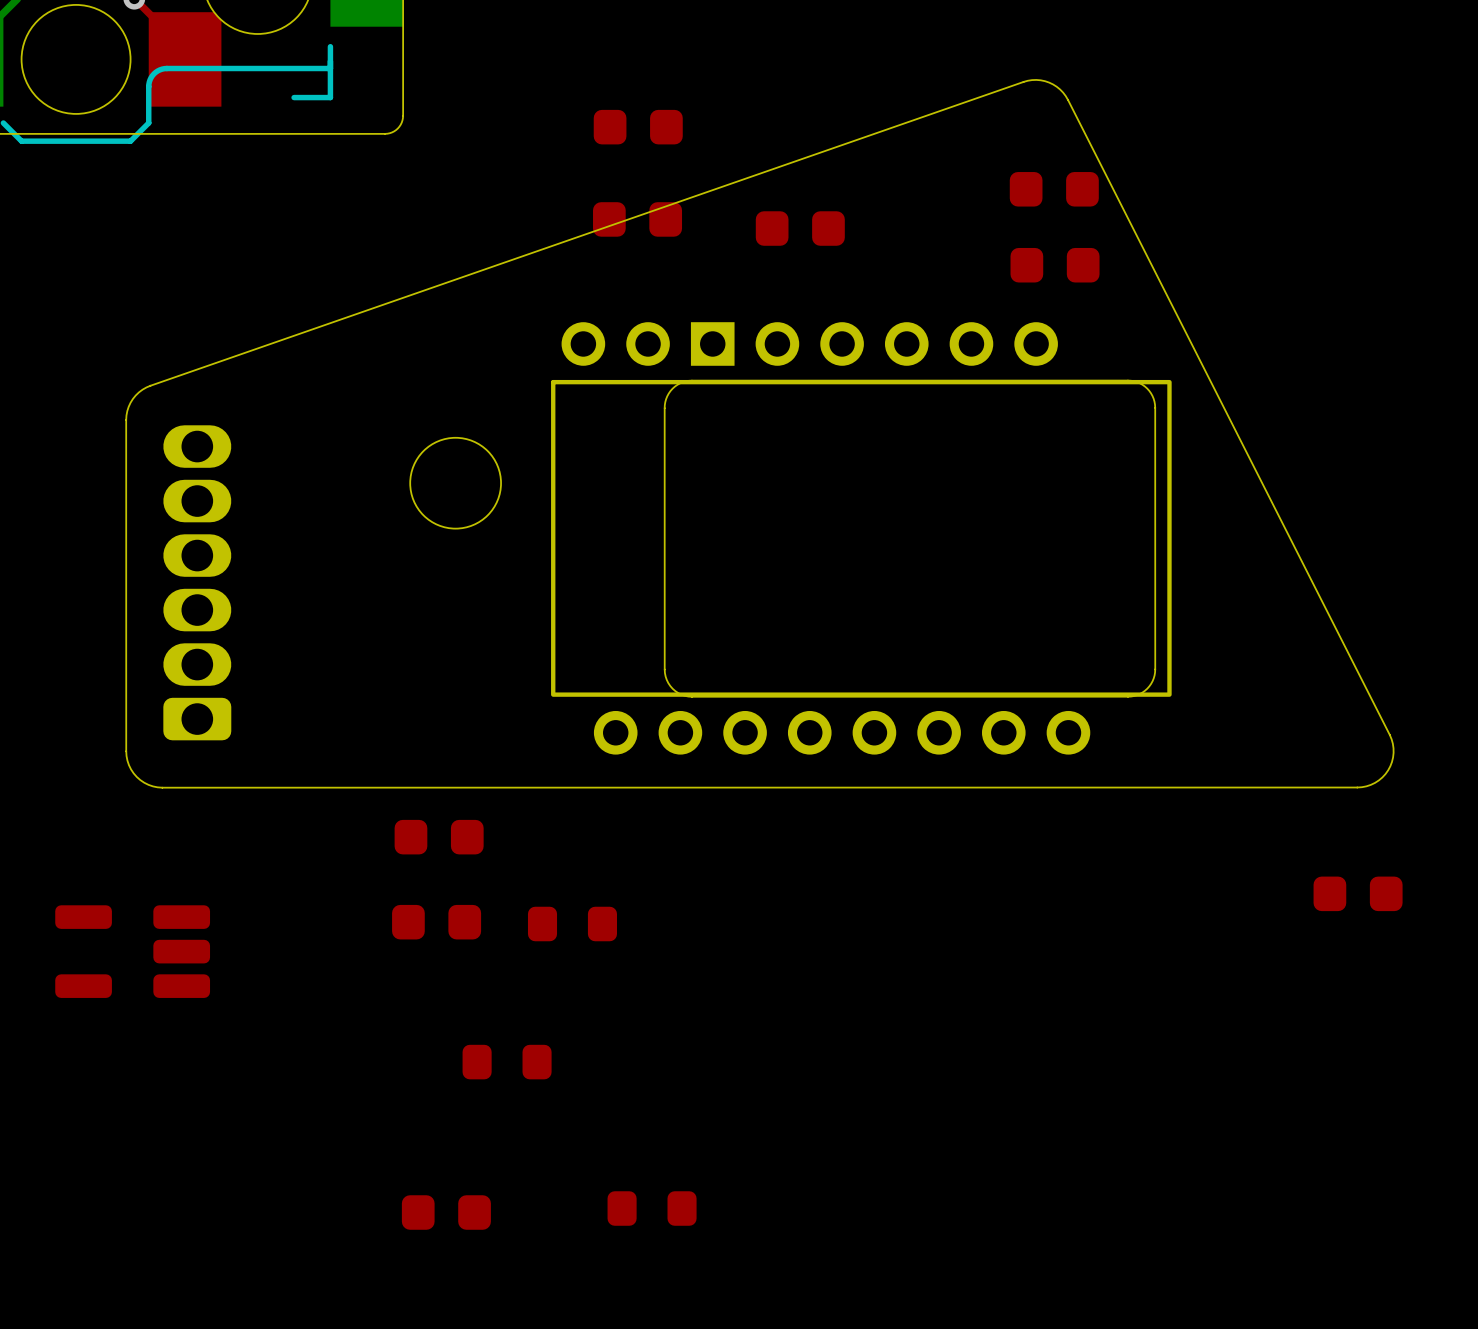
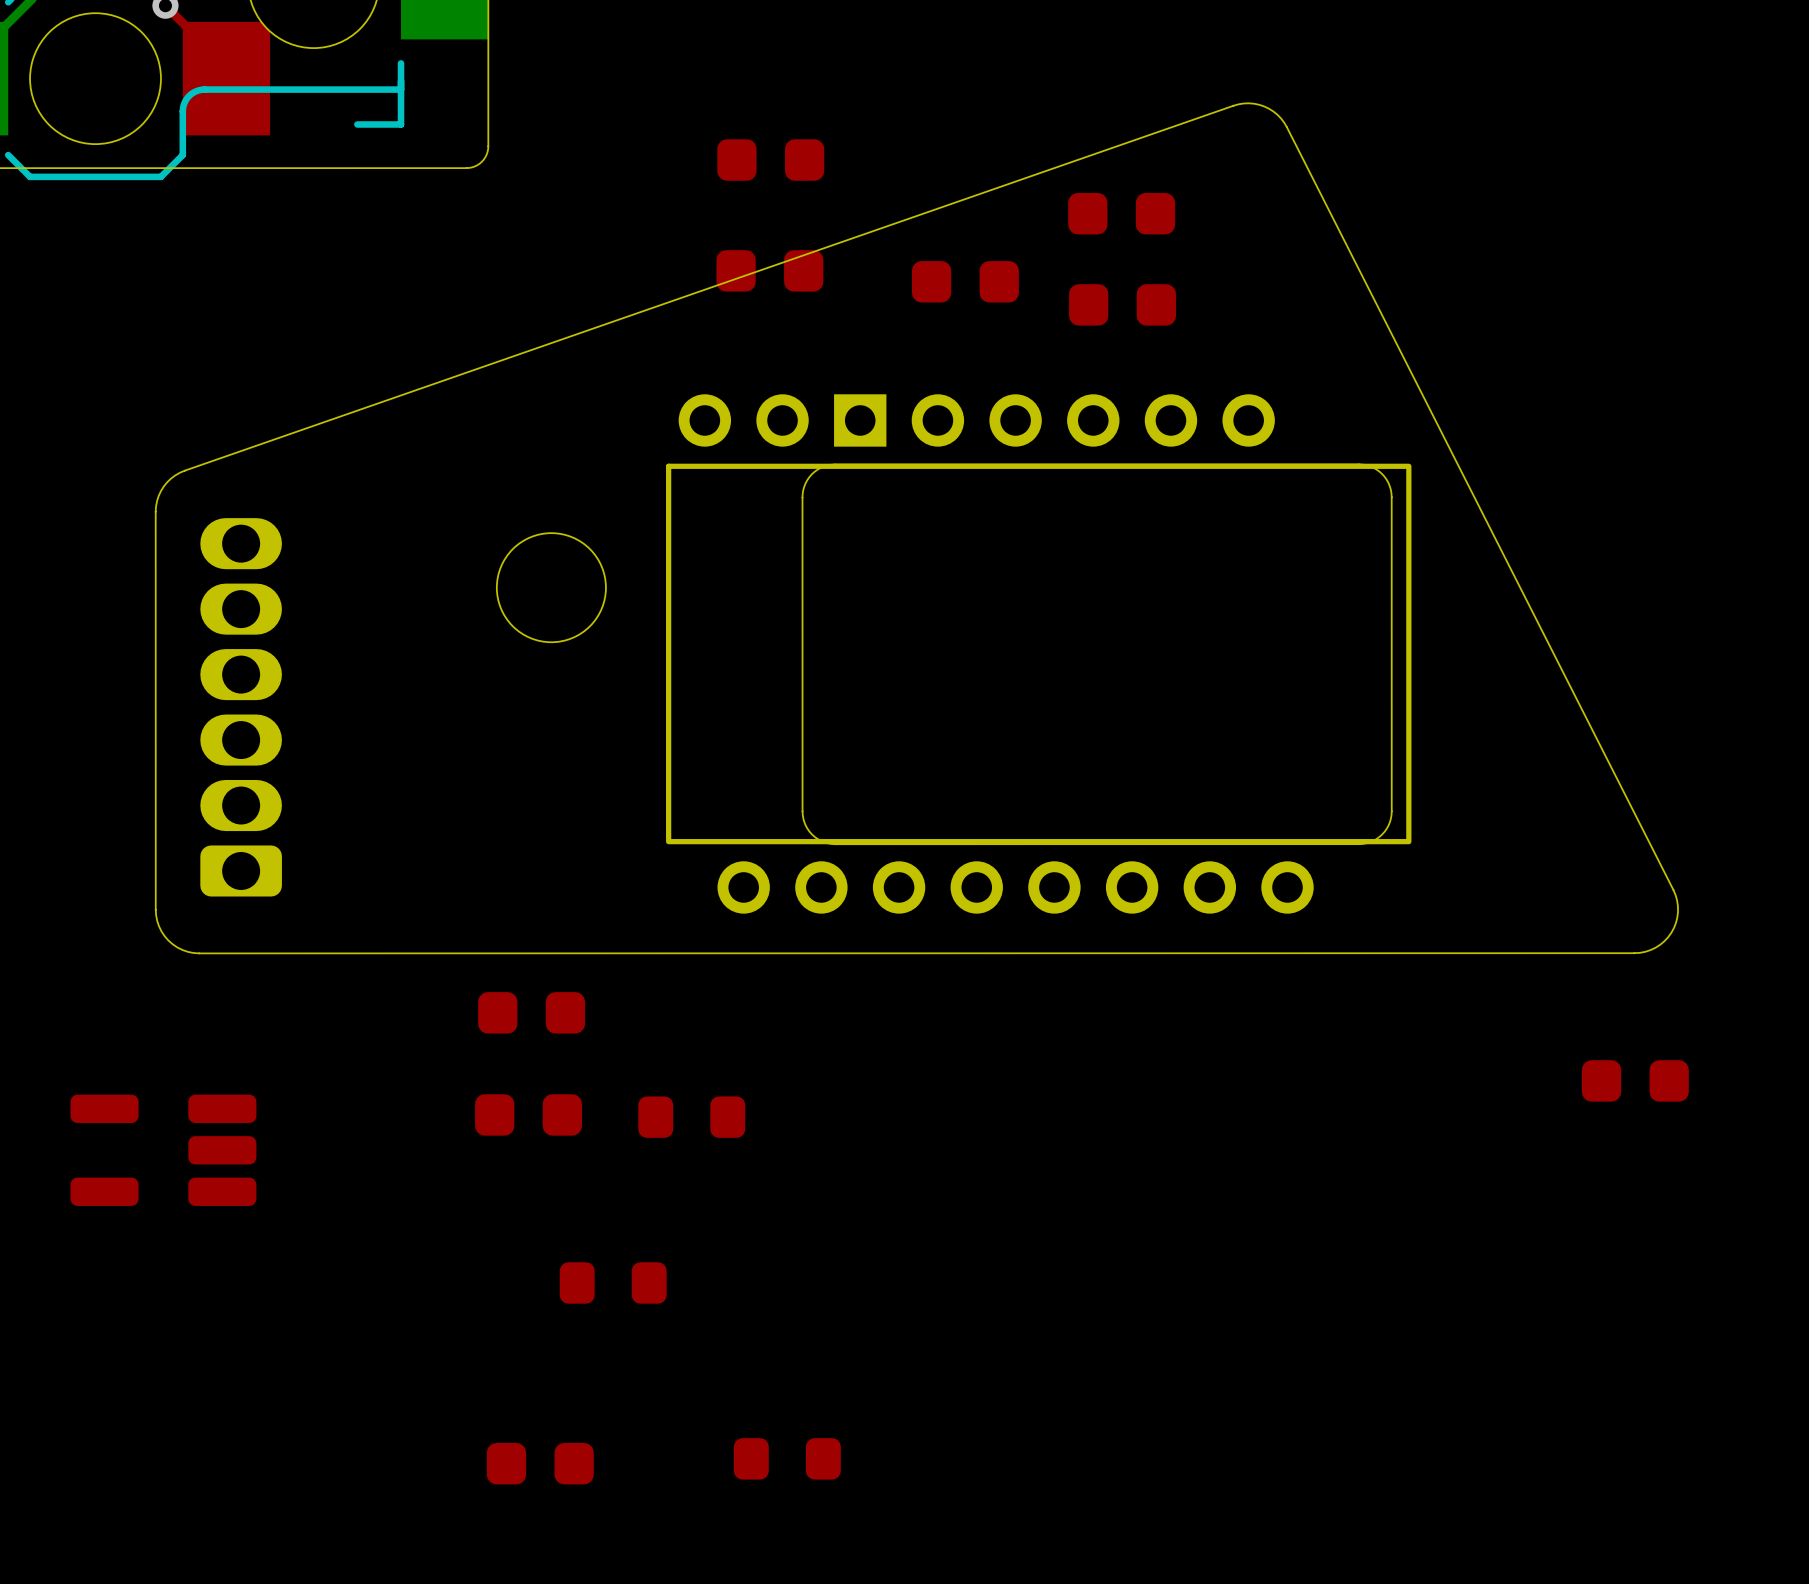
part: none -> (1121, 213)
part: (1054, 189) -> none
part: none -> (1122, 304)
part: (1055, 265) -> none

